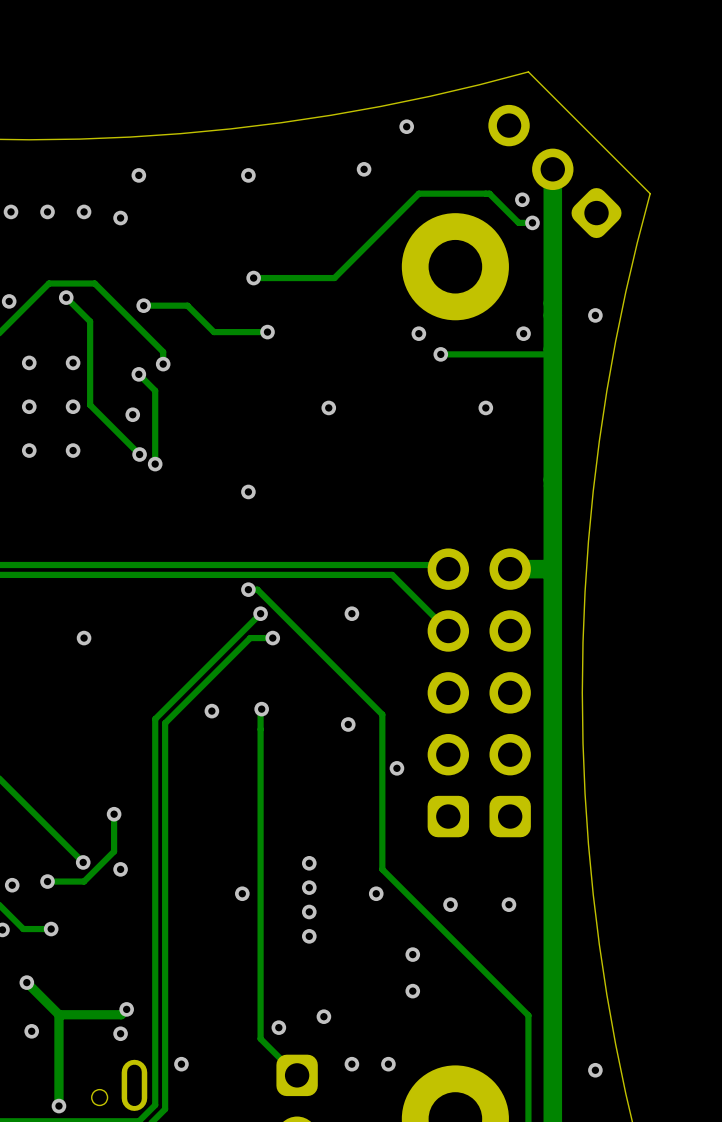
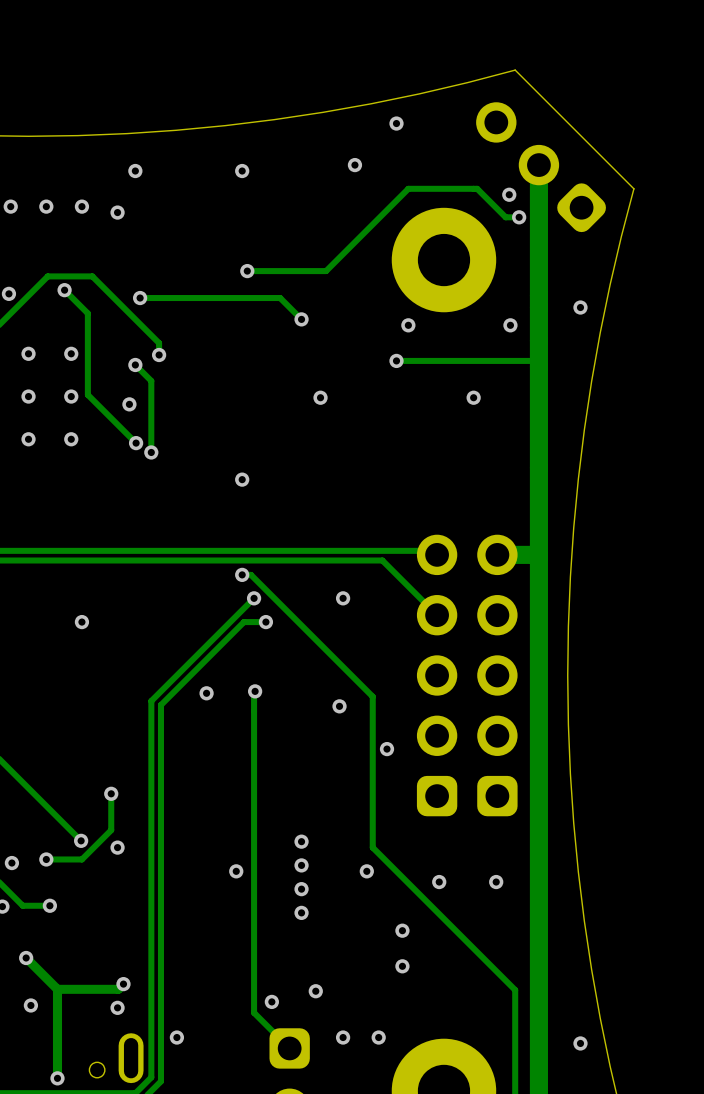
track: (187, 305) (213, 332) (267, 332) -> (182, 298) (280, 298) (301, 319)
via position: (267, 332) -> (301, 319)
via position: (440, 354) -> (396, 360)
track: (547, 354) (440, 354) -> none
track: none -> (396, 360) (533, 360) (538, 366)

